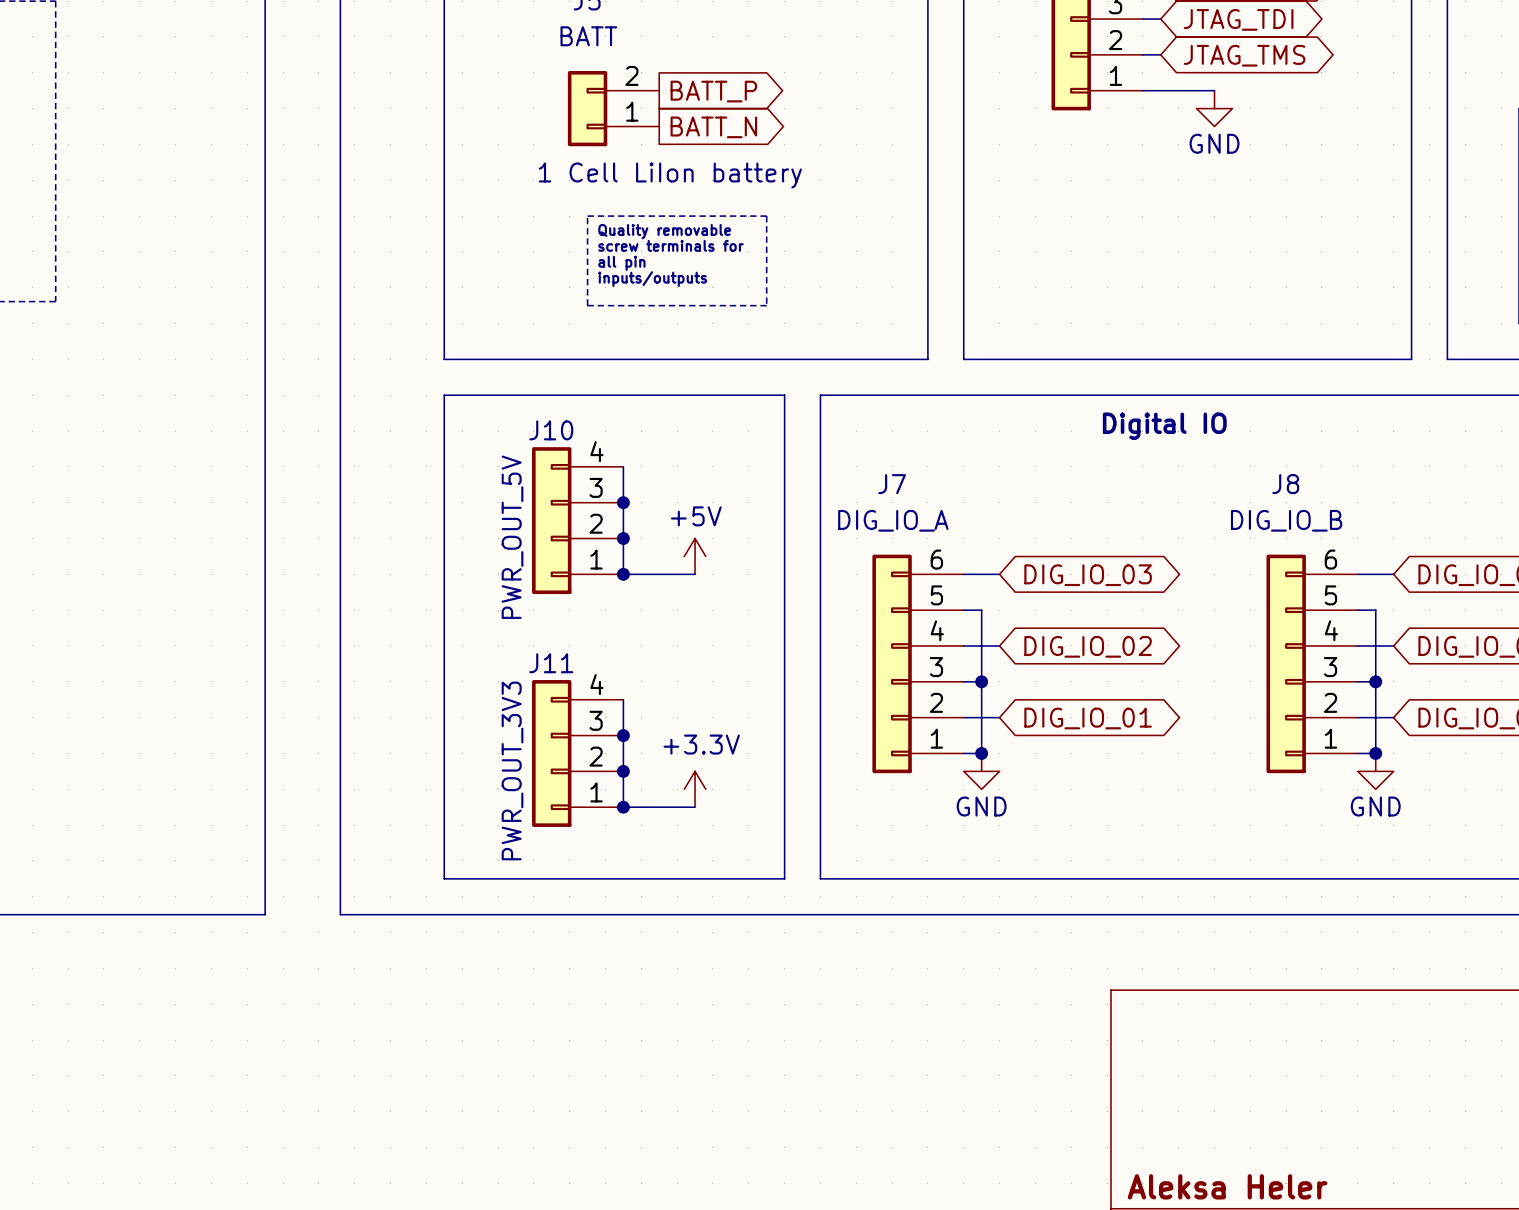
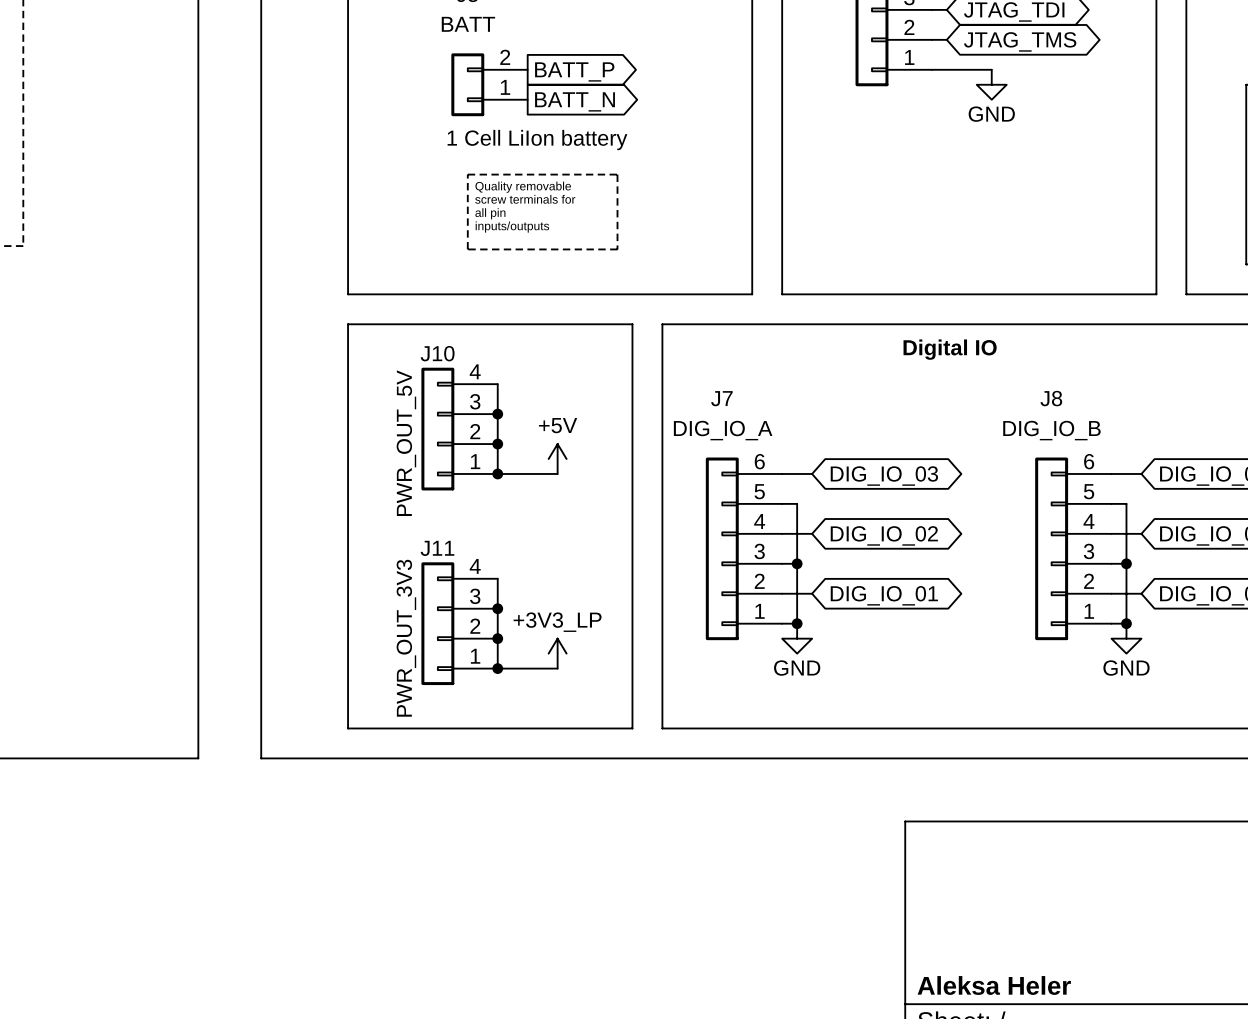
power symbol: +3.3V (695, 789) -> +3V3_LP (557, 653)

